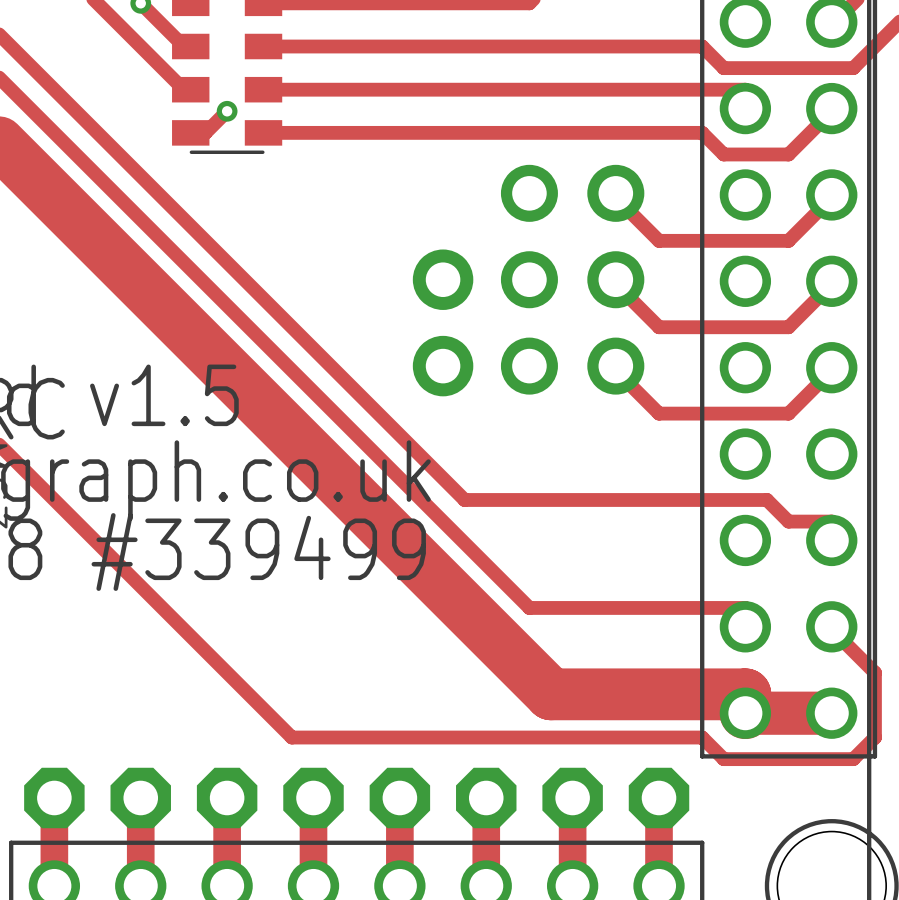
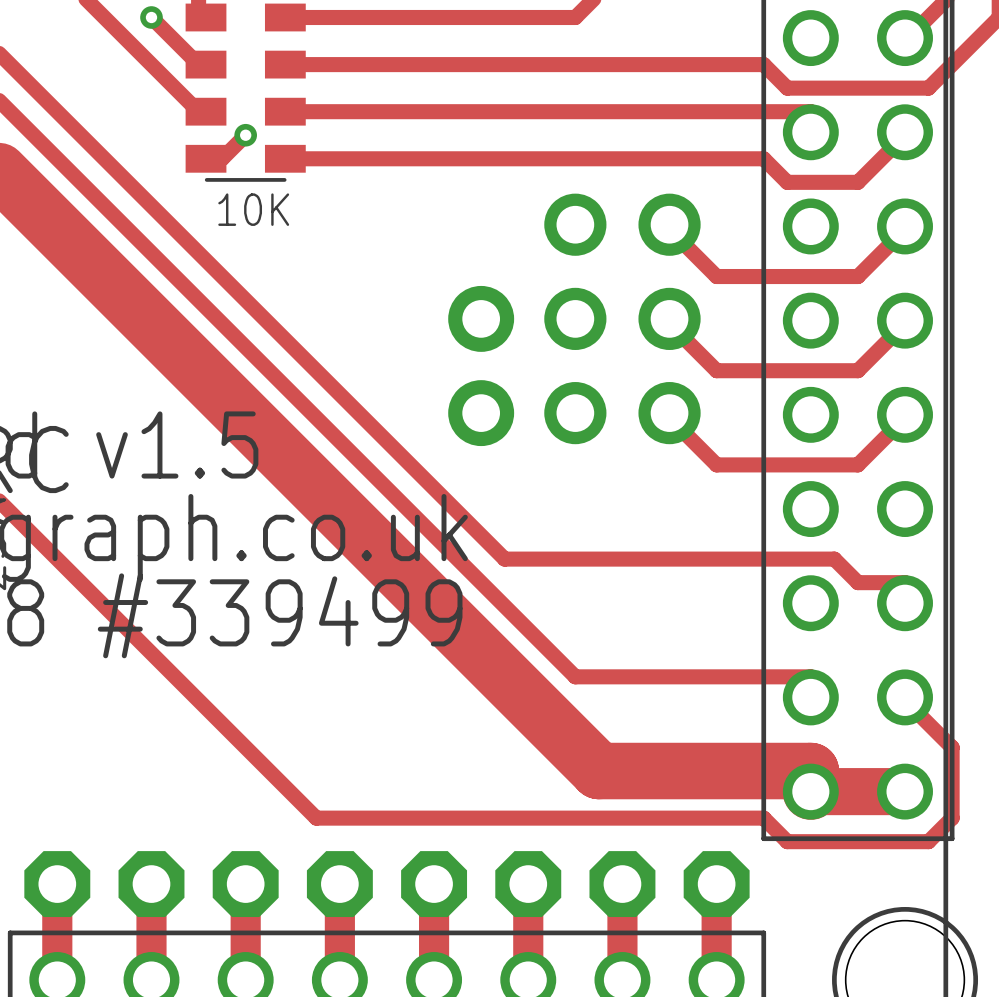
text: none -> 10K (253, 209)

